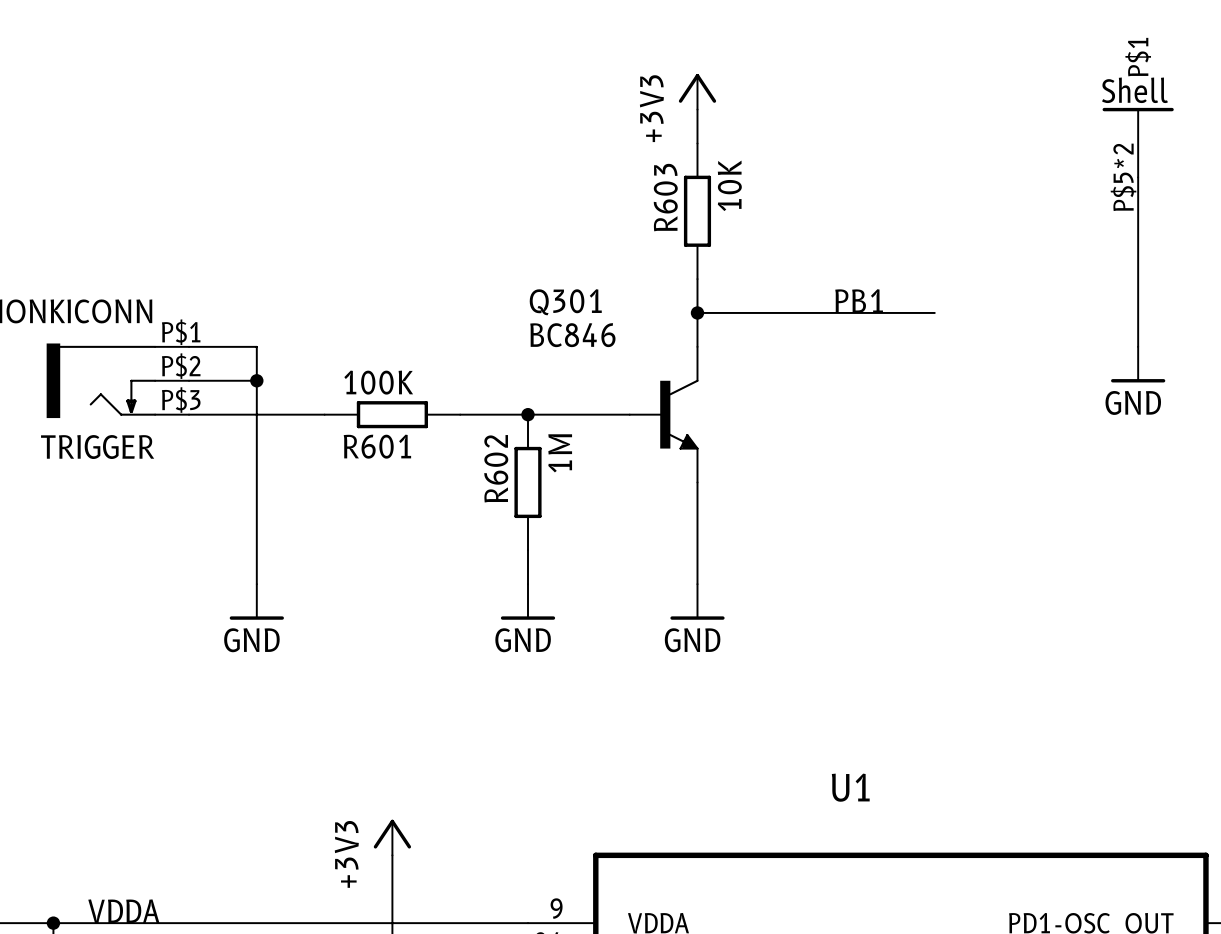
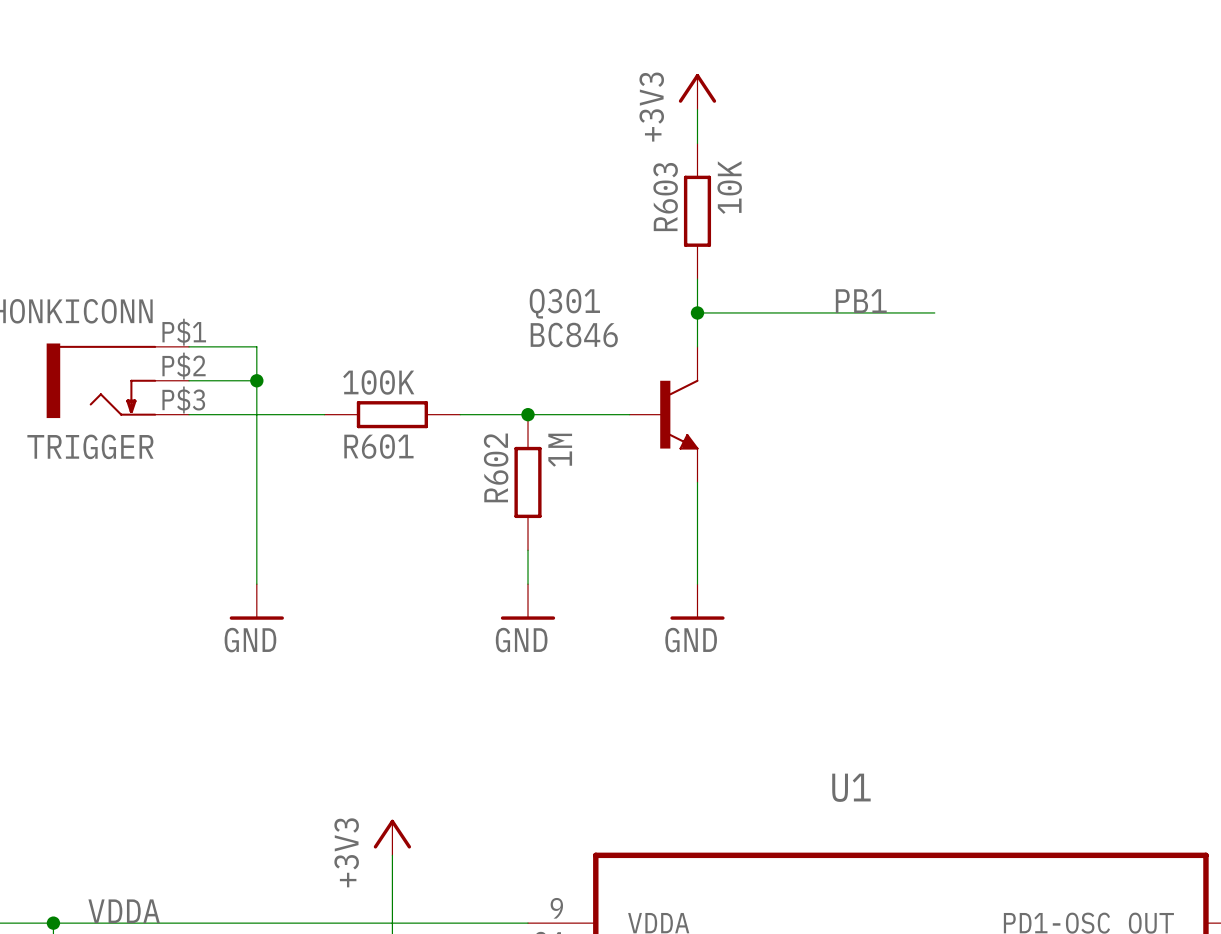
part: (1138, 142) -> none
wire: (1138, 177) (1138, 346) -> none
power symbol: GND (1138, 364) -> none

